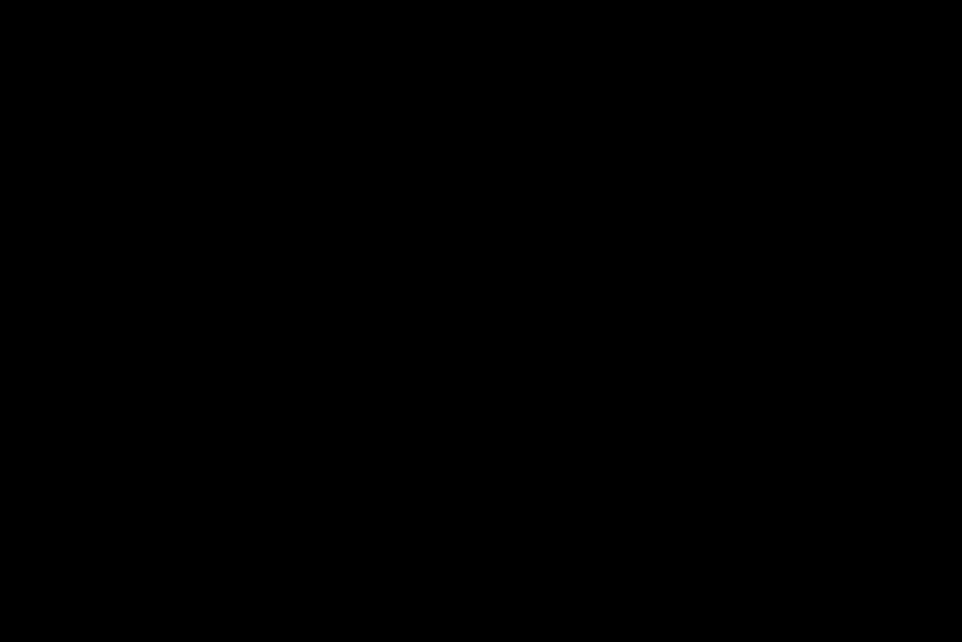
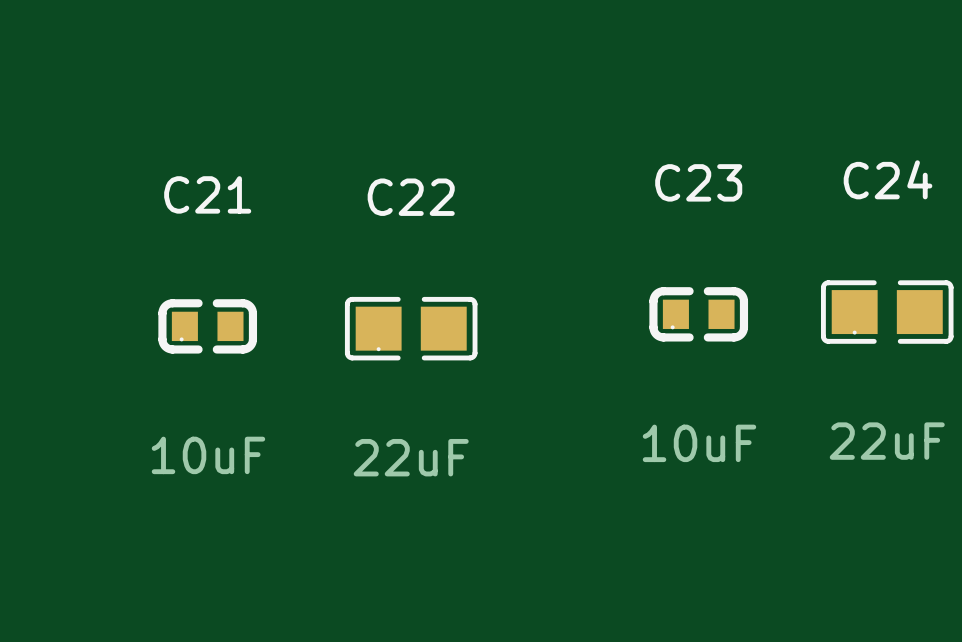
C24: none -> 22uF (887, 312)
C23: none -> 10uF (698, 314)
C21: none -> 10uF (207, 326)
C22: none -> 22uF (411, 328)

